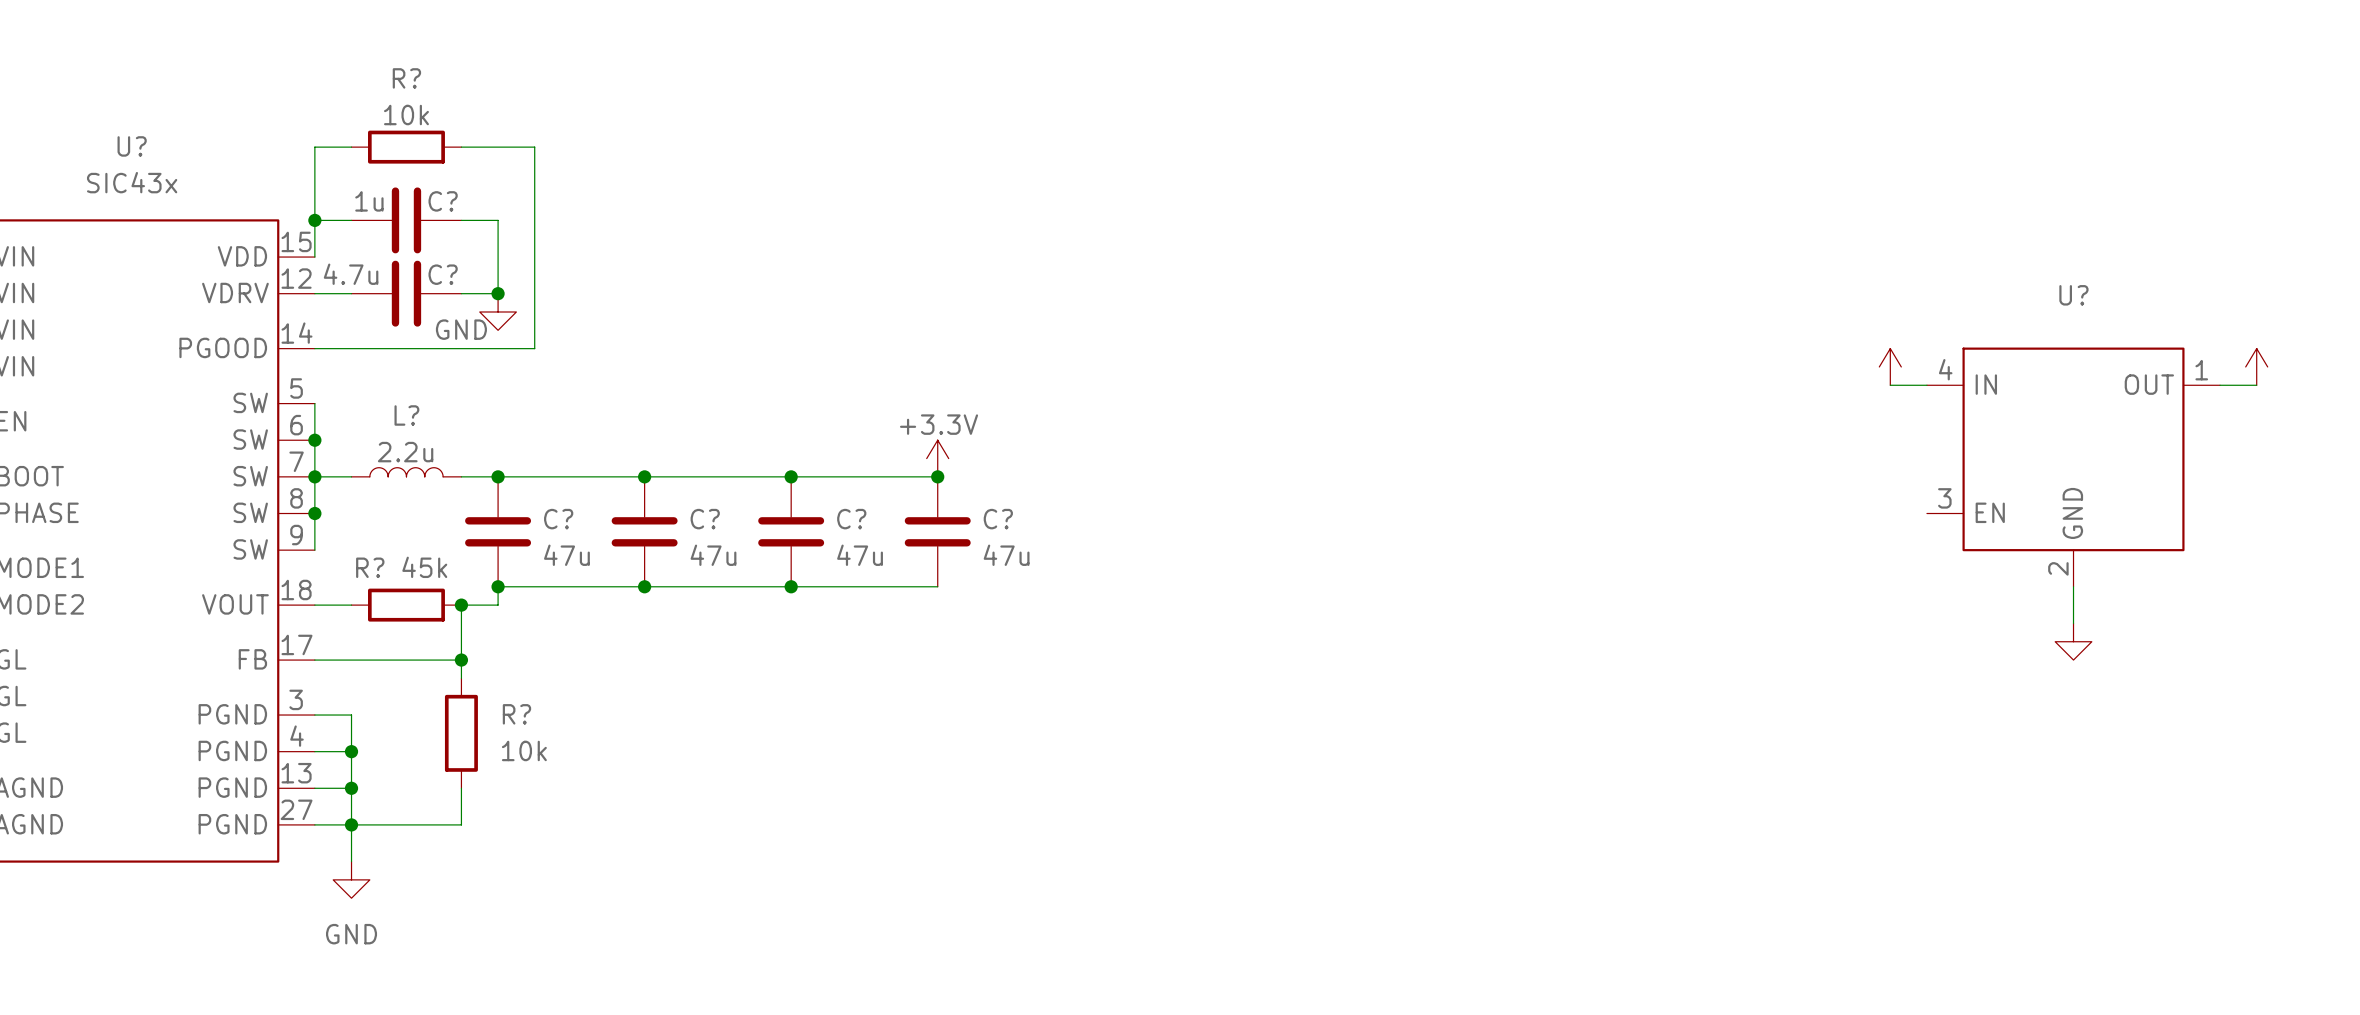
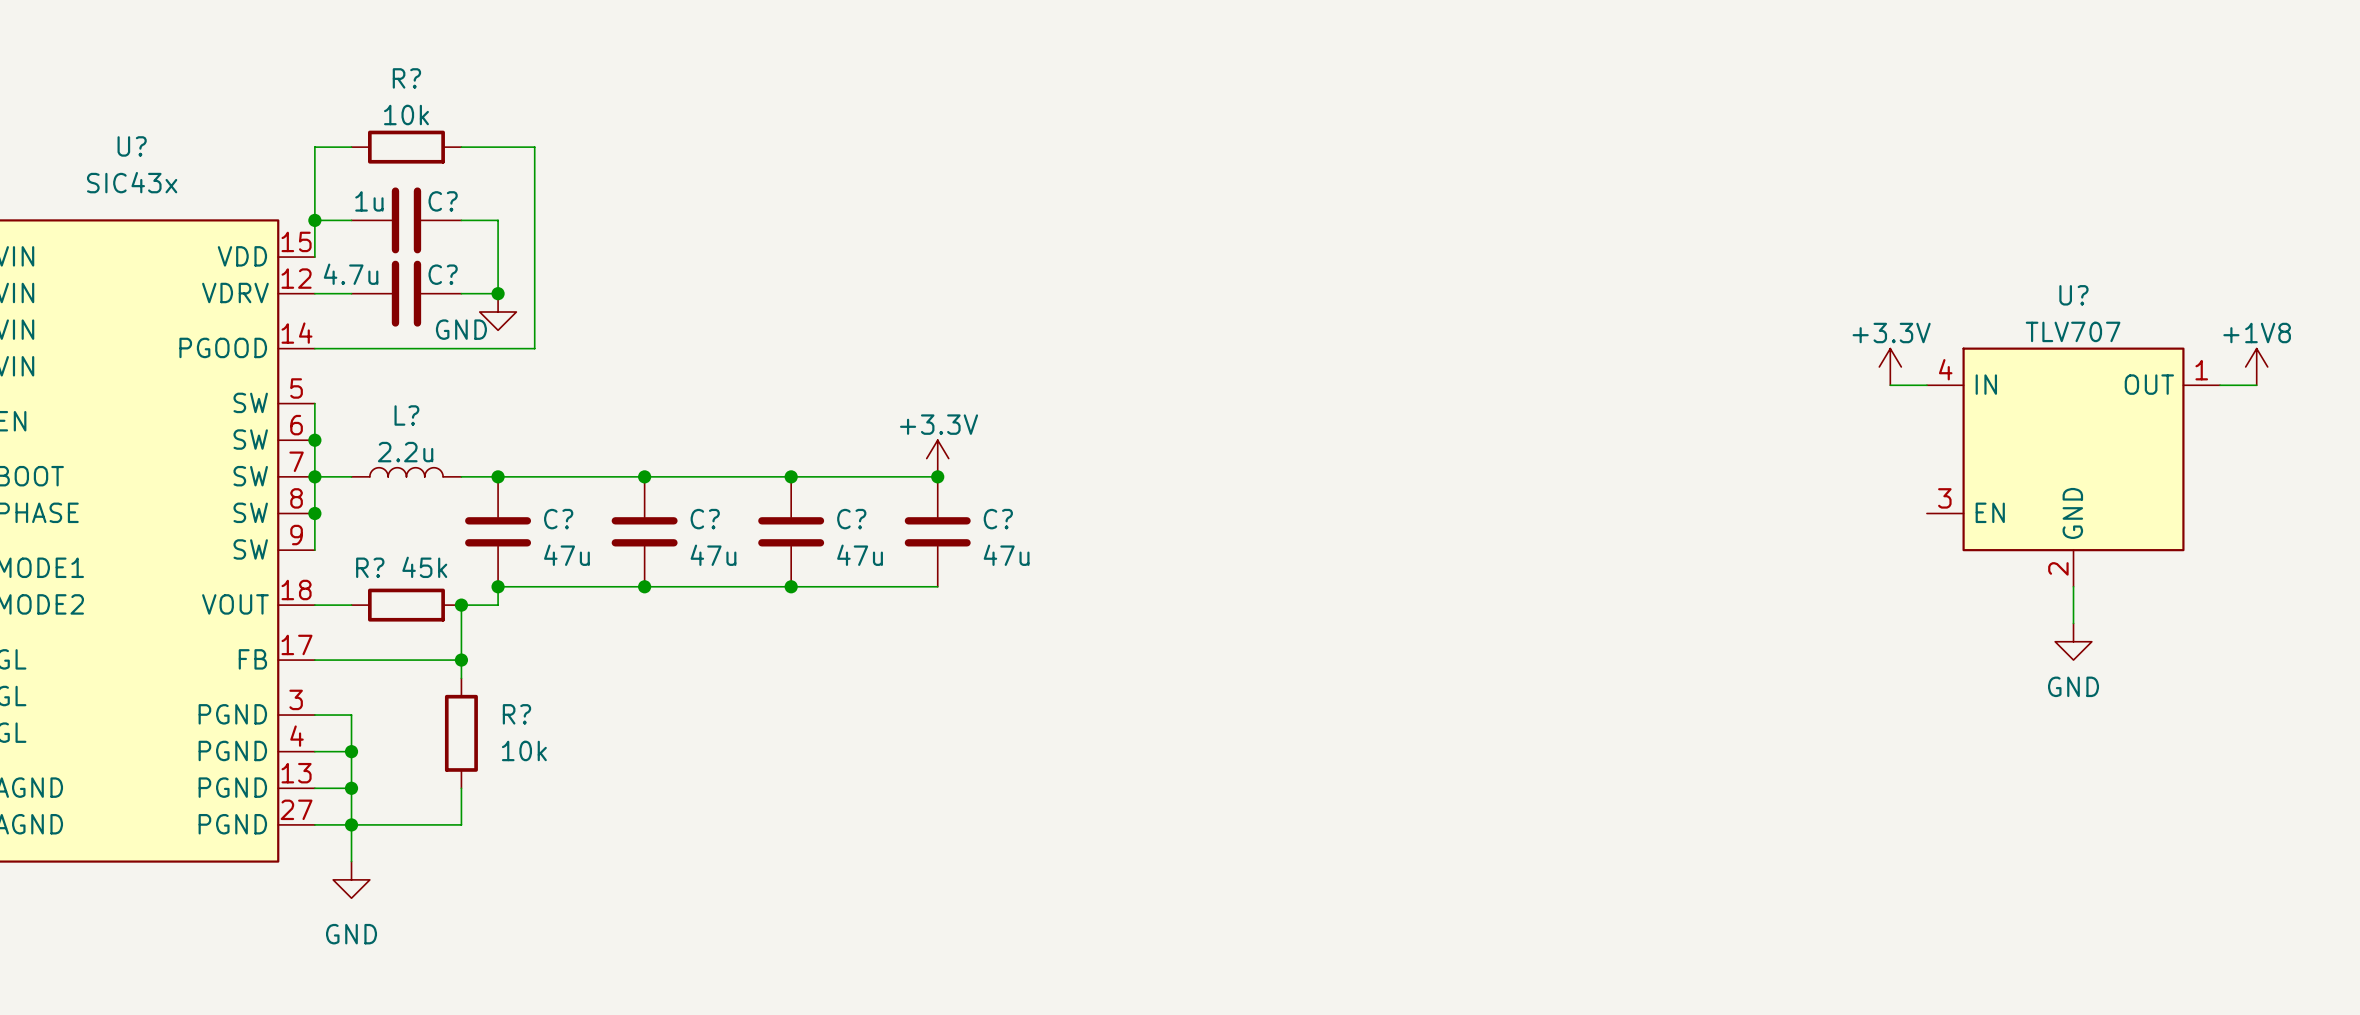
U? value: none -> TLV707 (2073, 331)
power symbol text: none -> +3.3V (1891, 333)
power symbol text: none -> +1V8 (2257, 333)
U? symbol: [1926, 347, 2221, 587] -> [1926, 347, 2221, 587]
power symbol text: none -> GND (2073, 686)

